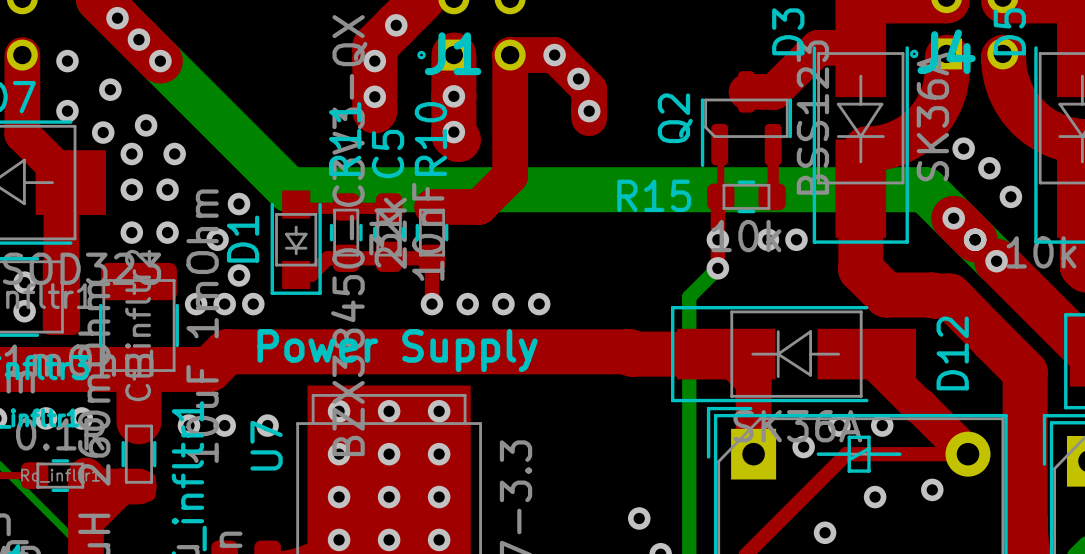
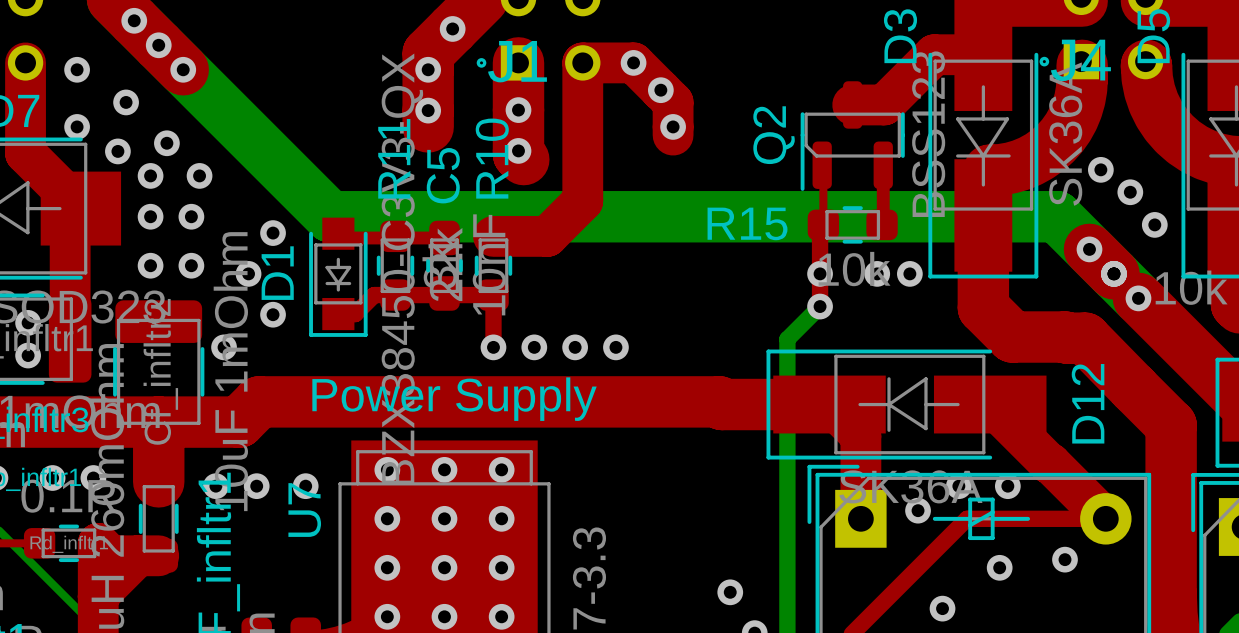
via: (224, 304) -> none
via: (253, 304) -> none

